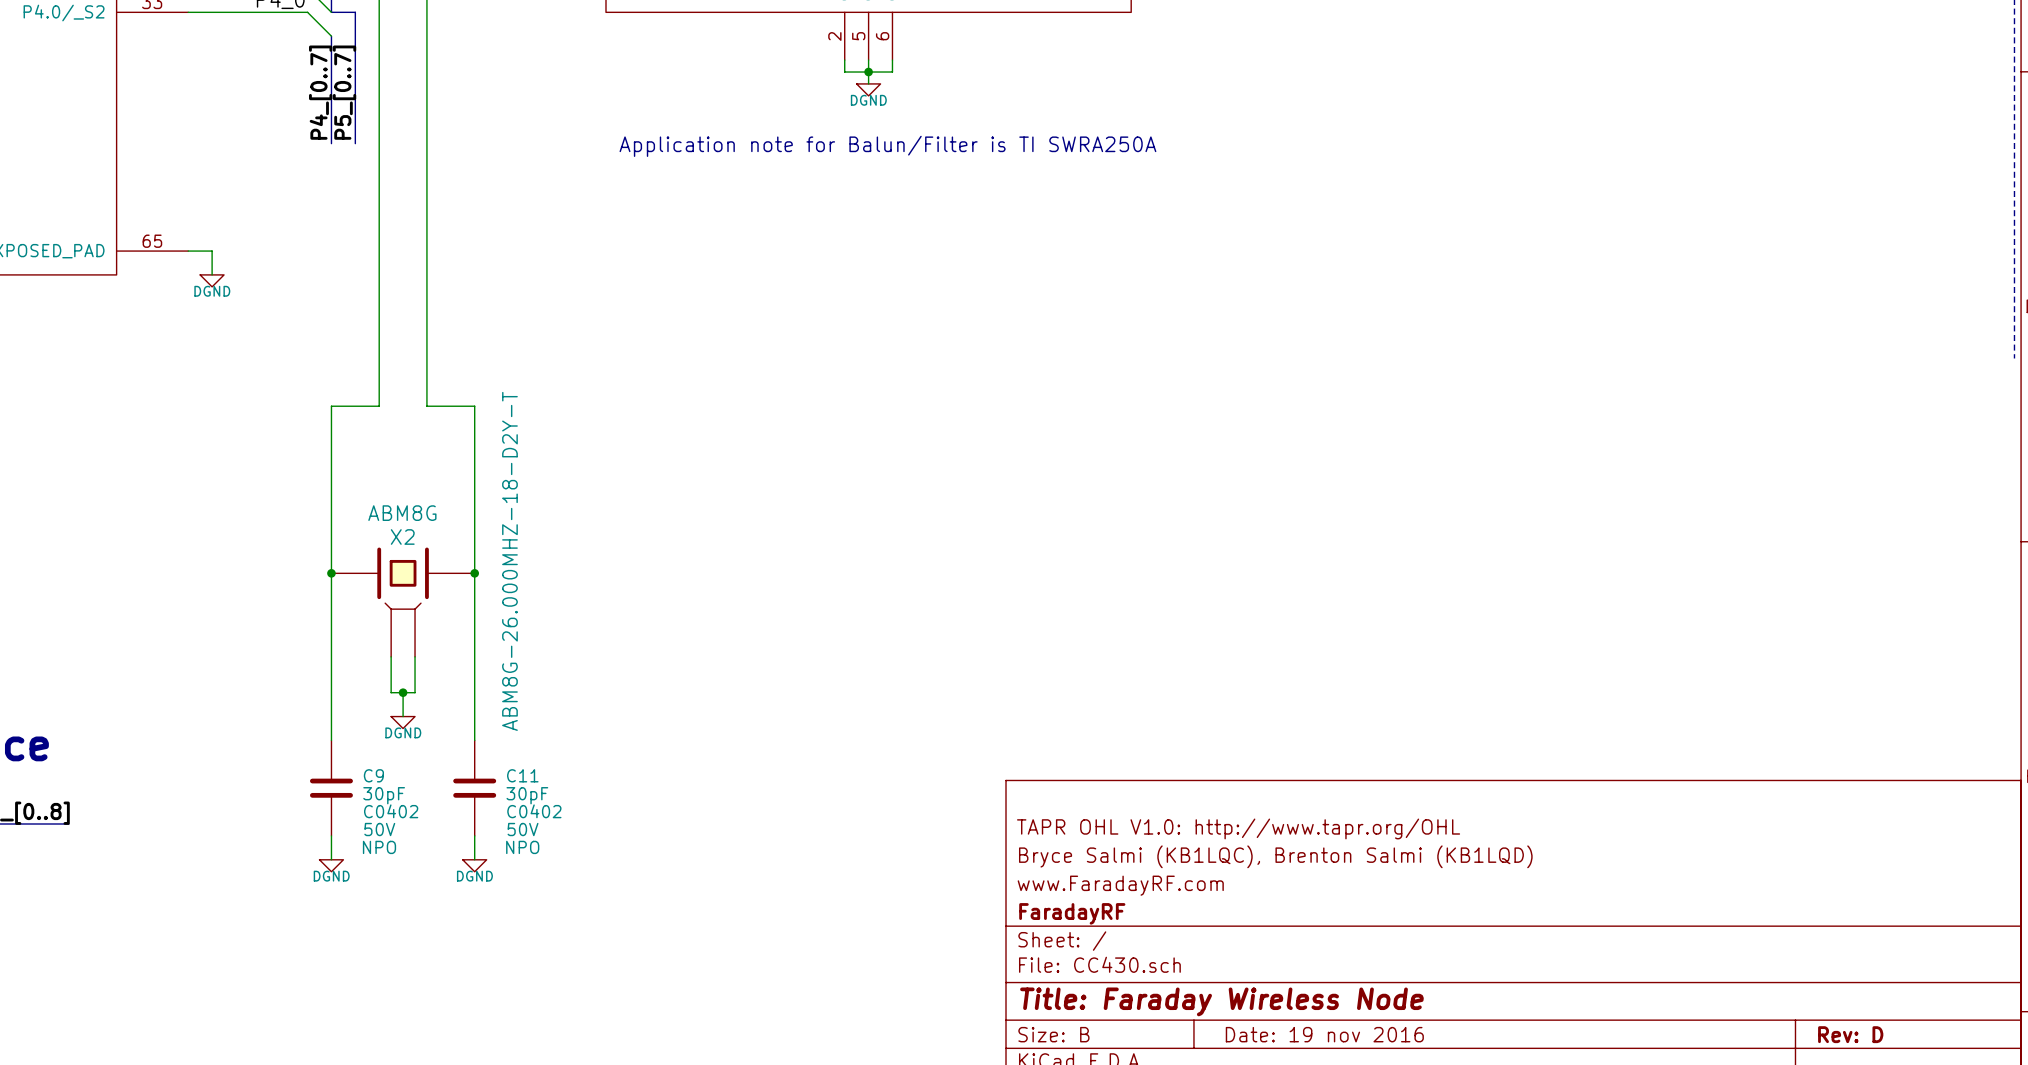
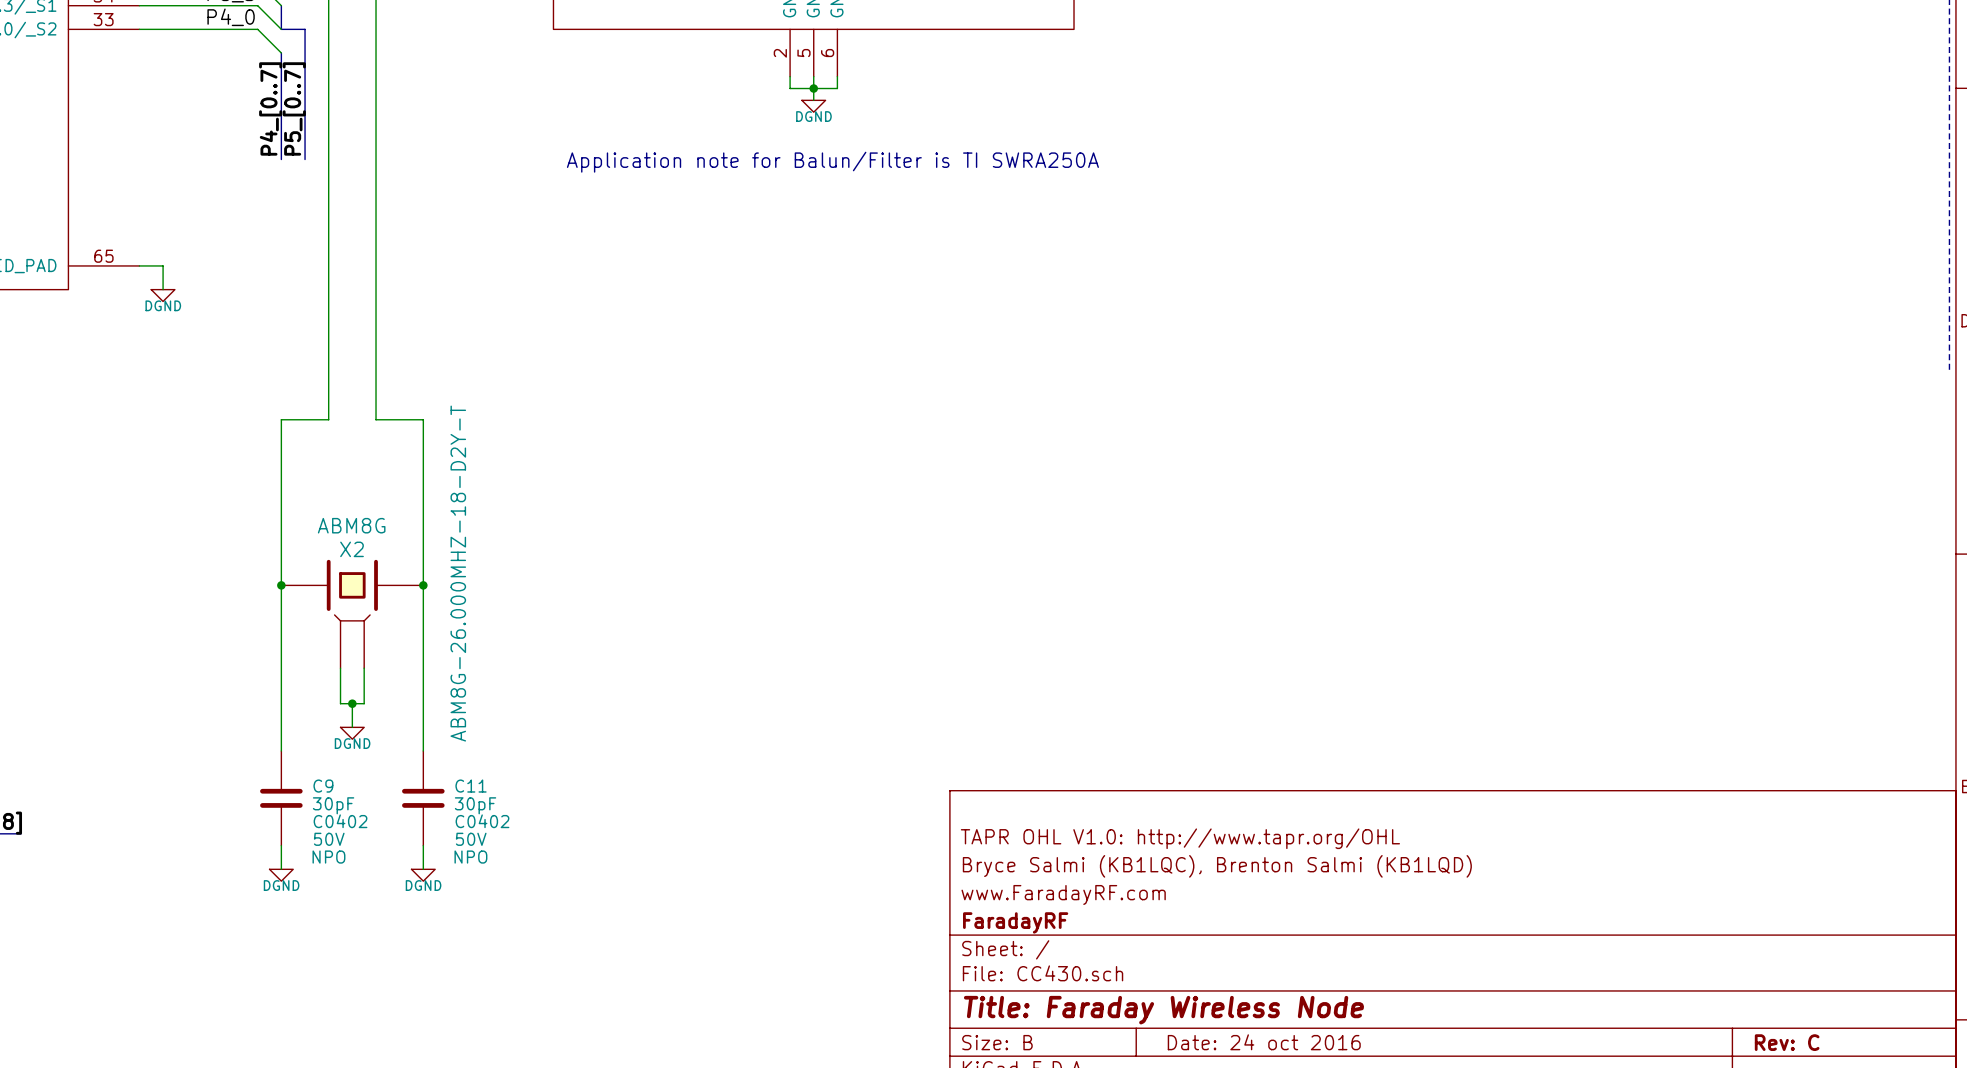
title block: Date: 19 nov 2016 (1324, 1034) -> Date: 24 oct 2016 (1264, 1042)
title block: Rev: D (1850, 1034) -> Rev: C (1787, 1042)

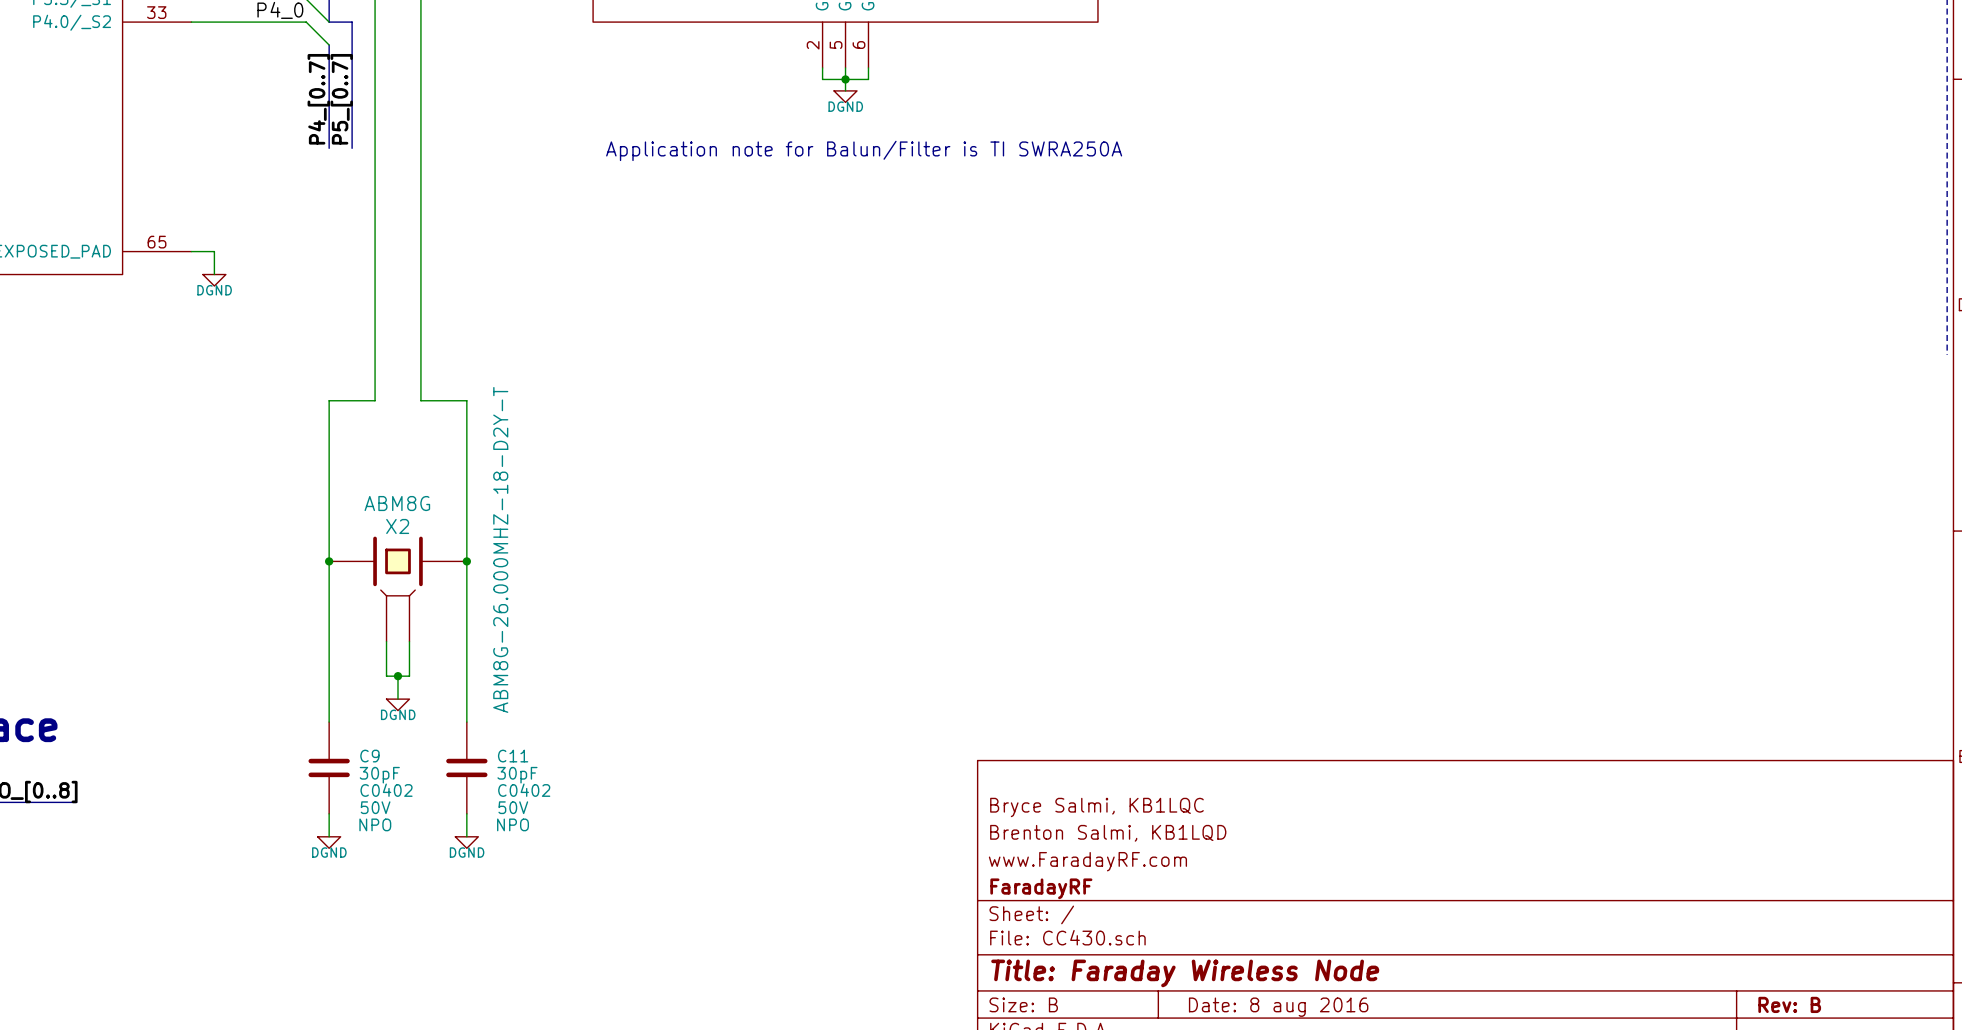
title block: TAPR OHL V1.0: http://www.tapr.org/OHL (1180, 838) -> Bryce Salmi, KB1LQC (1096, 807)
title block: Bryce Salmi (KB1LQC), Brenton Salmi (KB1LQD) (1217, 866) -> Brenton Salmi, KB1LQD (1108, 833)
title block: Date: 24 oct 2016 (1264, 1042) -> Date: 8 aug 2016 (1278, 1007)
title block: Rev: C (1787, 1042) -> Rev: B (1789, 1004)

